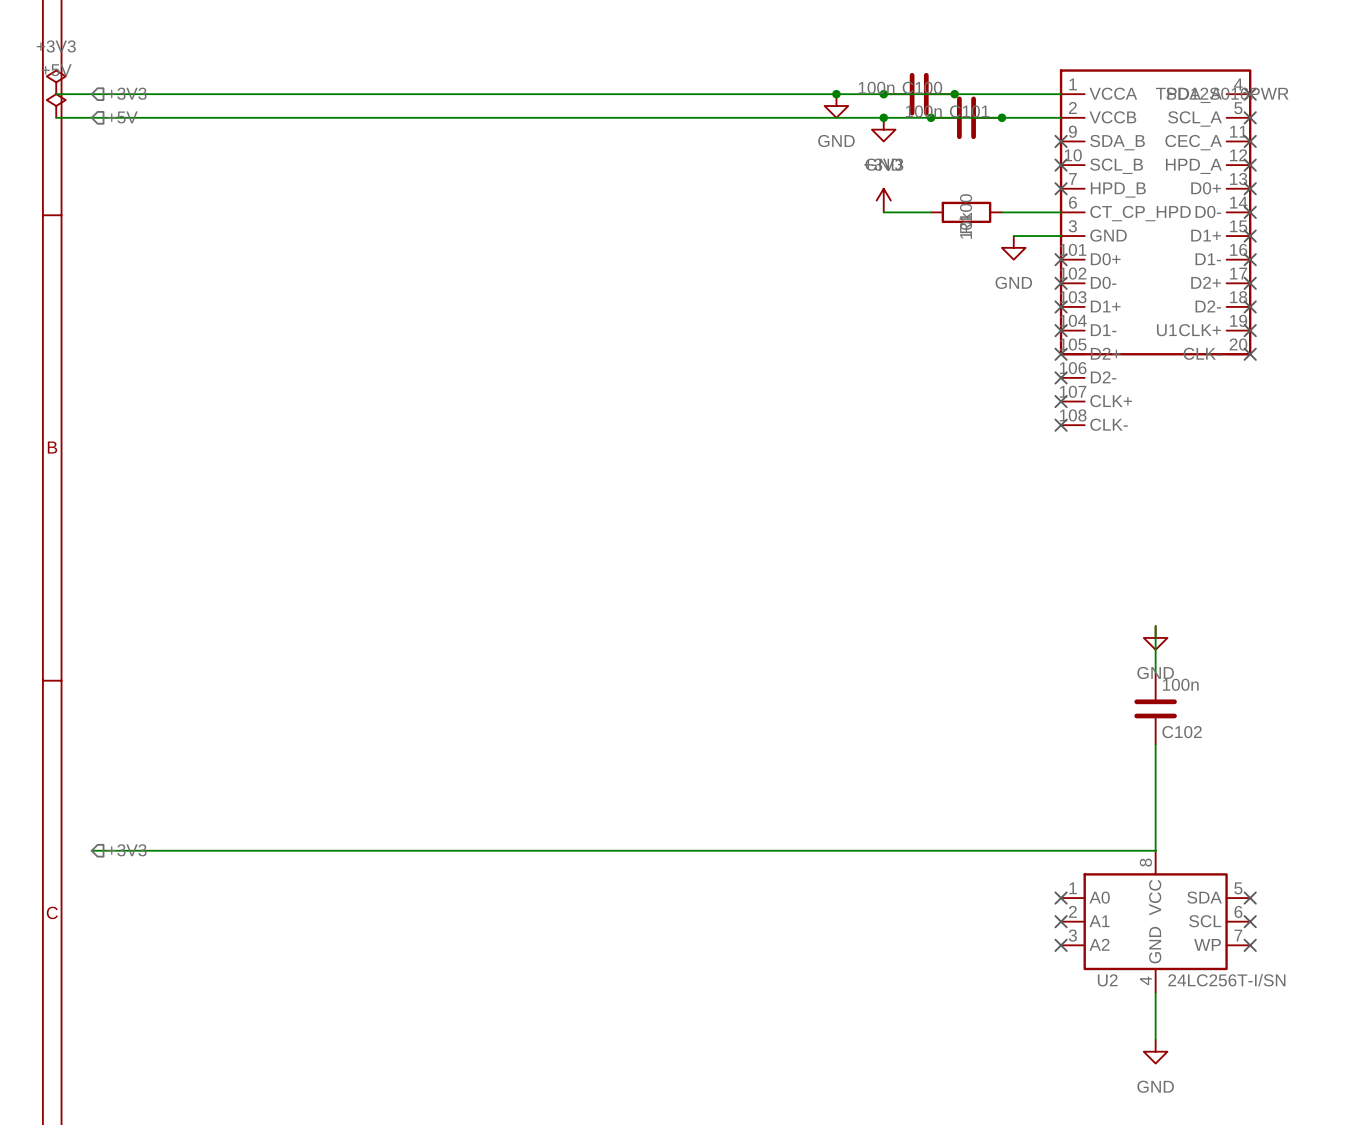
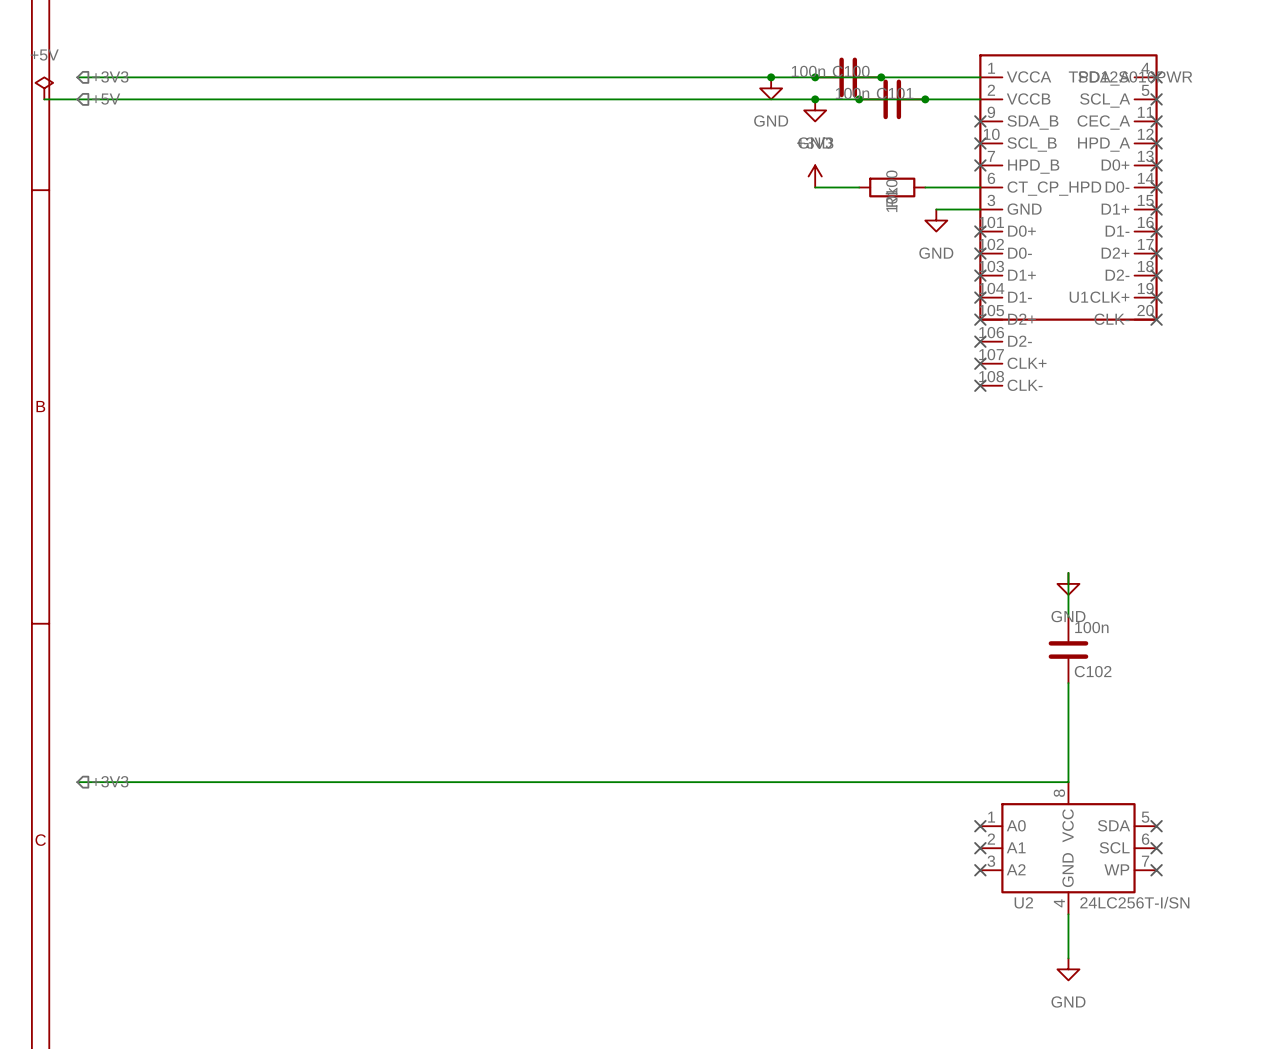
power symbol: +3V3 (56, 82) -> none
wire: (56, 94) (91, 94) -> none

